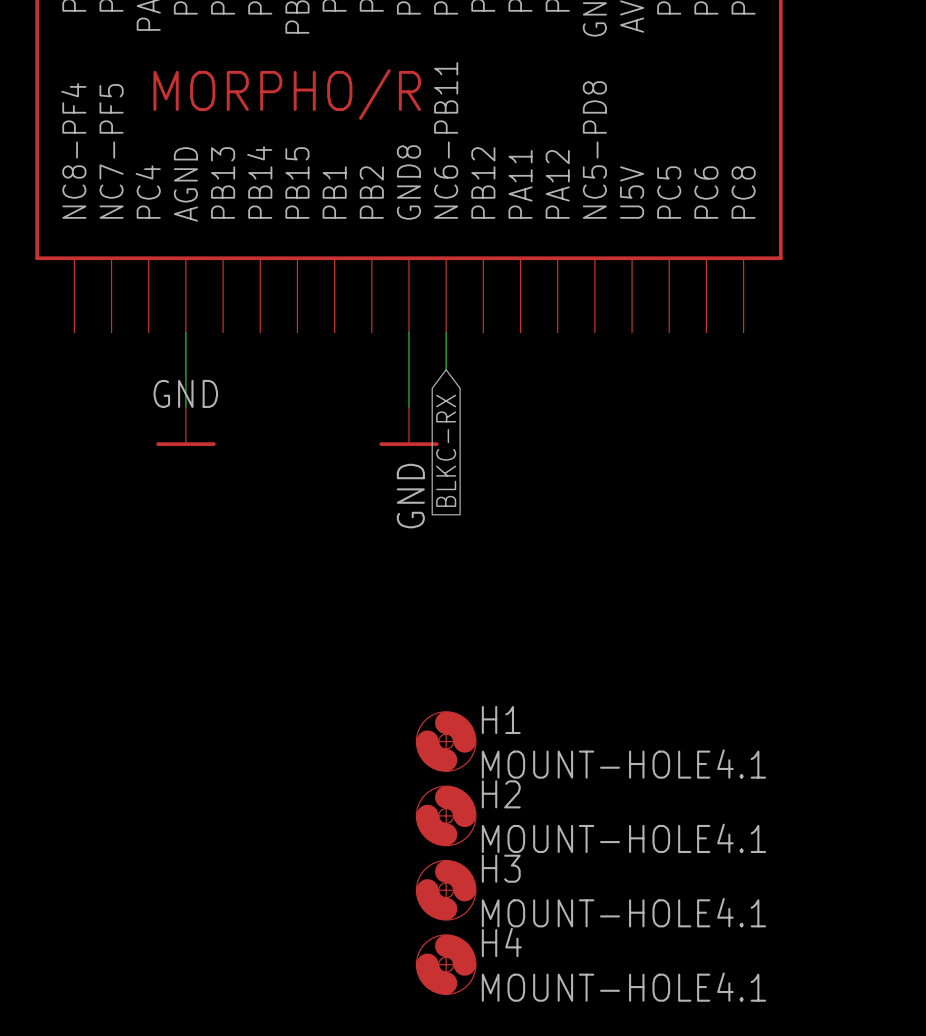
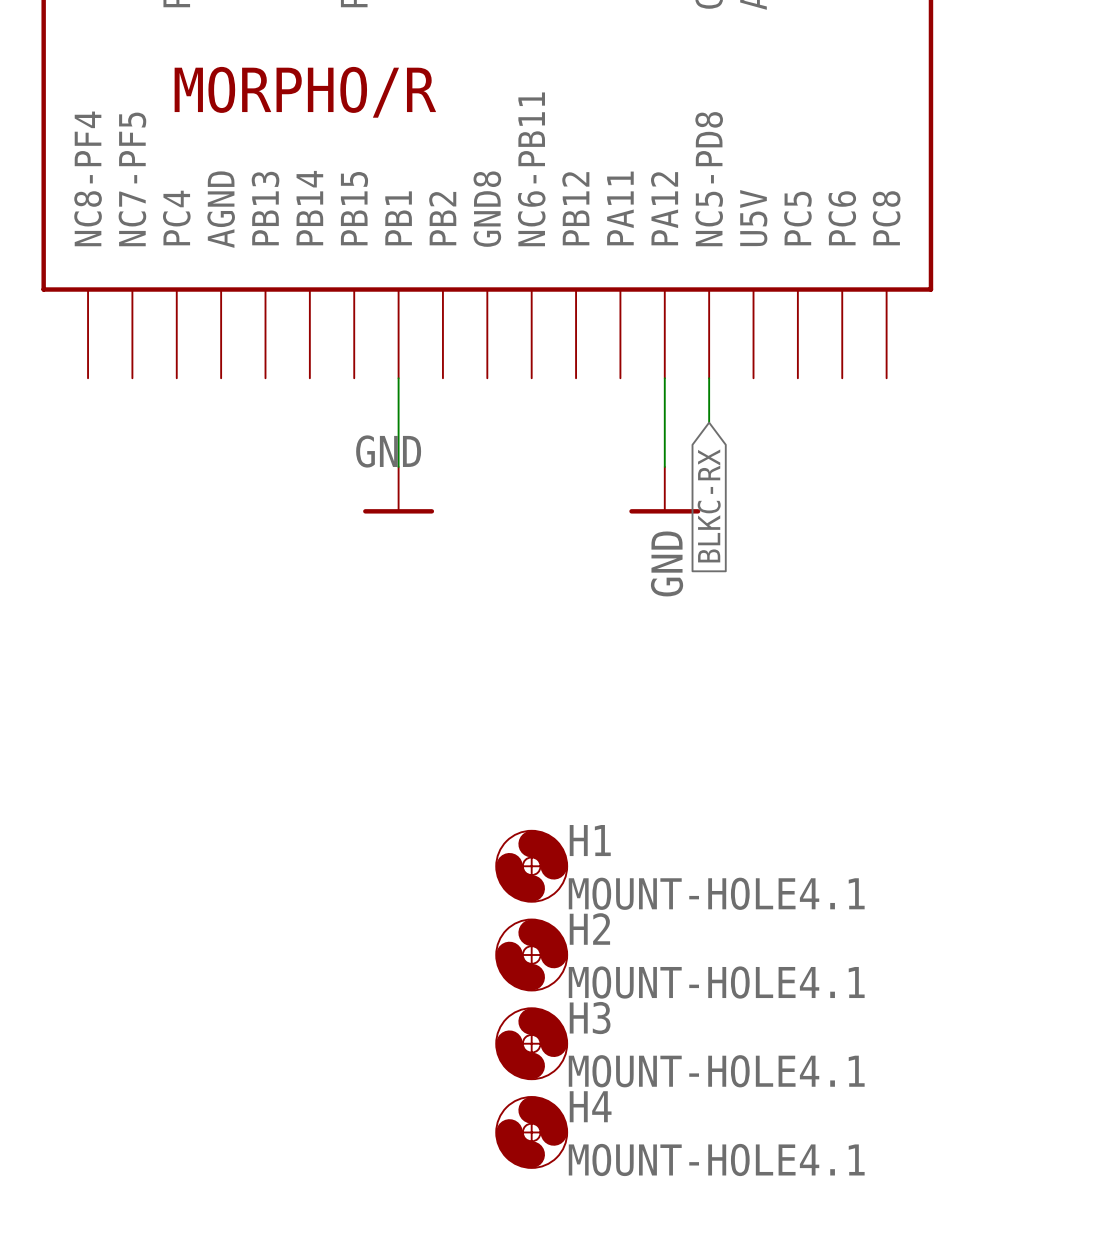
wire: (185, 332) (185, 406) -> (398, 378) (398, 466)
wire: (408, 332) (408, 406) -> (664, 378) (664, 466)
wire: (446, 332) (446, 369) -> (709, 378) (709, 422)
power symbol: GND (185, 426) -> none
power symbol: none -> GND (398, 490)
power symbol: GND (408, 426) -> none
power symbol: none -> GND (664, 490)
global label position: BLKC-RX (446, 450) -> BLKC-RX (709, 505)

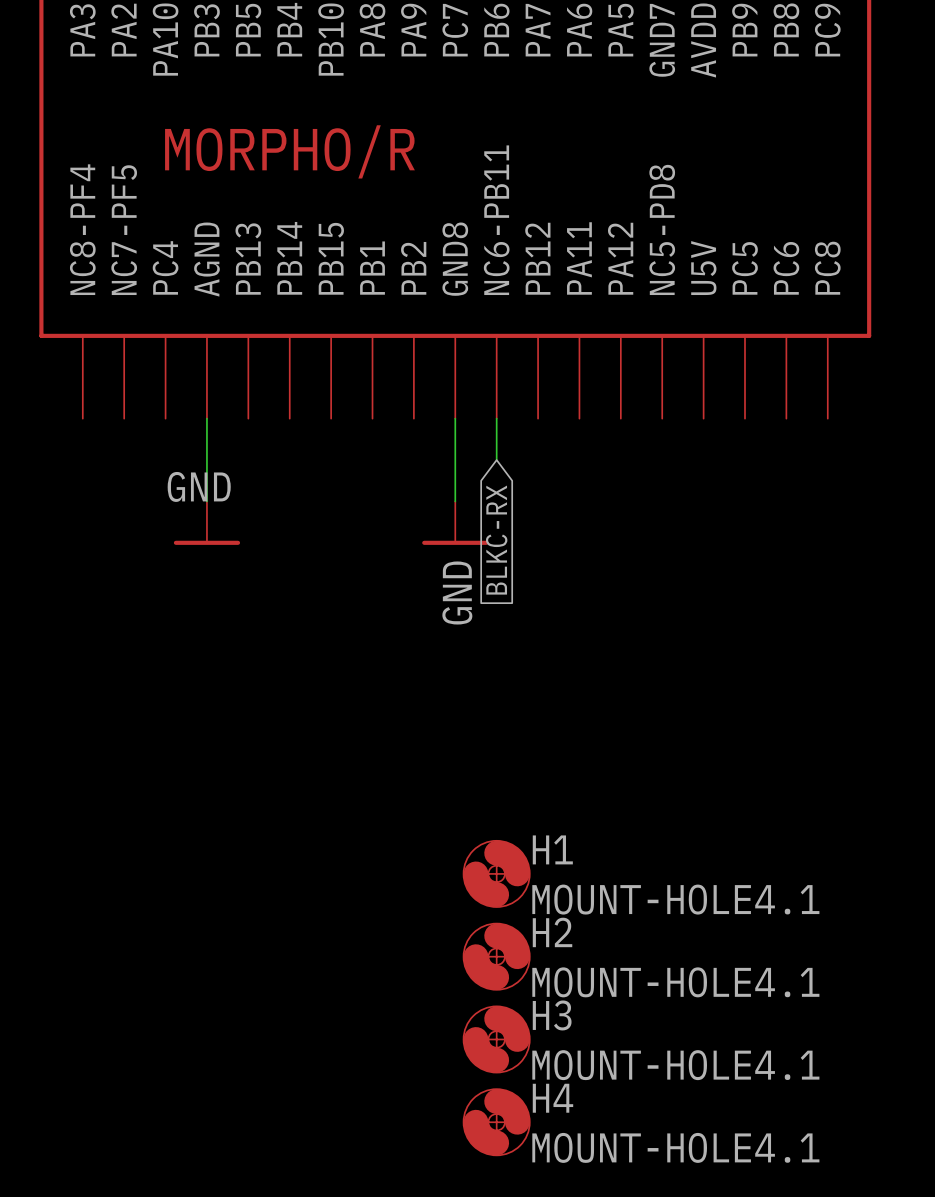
wire: (398, 378) (398, 466) -> (206, 418) (206, 501)
wire: (664, 378) (664, 466) -> (455, 418) (455, 501)
wire: (709, 378) (709, 422) -> (496, 418) (496, 460)
power symbol: none -> GND (206, 523)
power symbol: GND (398, 490) -> none
power symbol: none -> GND (455, 523)
power symbol: GND (664, 490) -> none
global label position: BLKC-RX (709, 505) -> BLKC-RX (496, 540)

